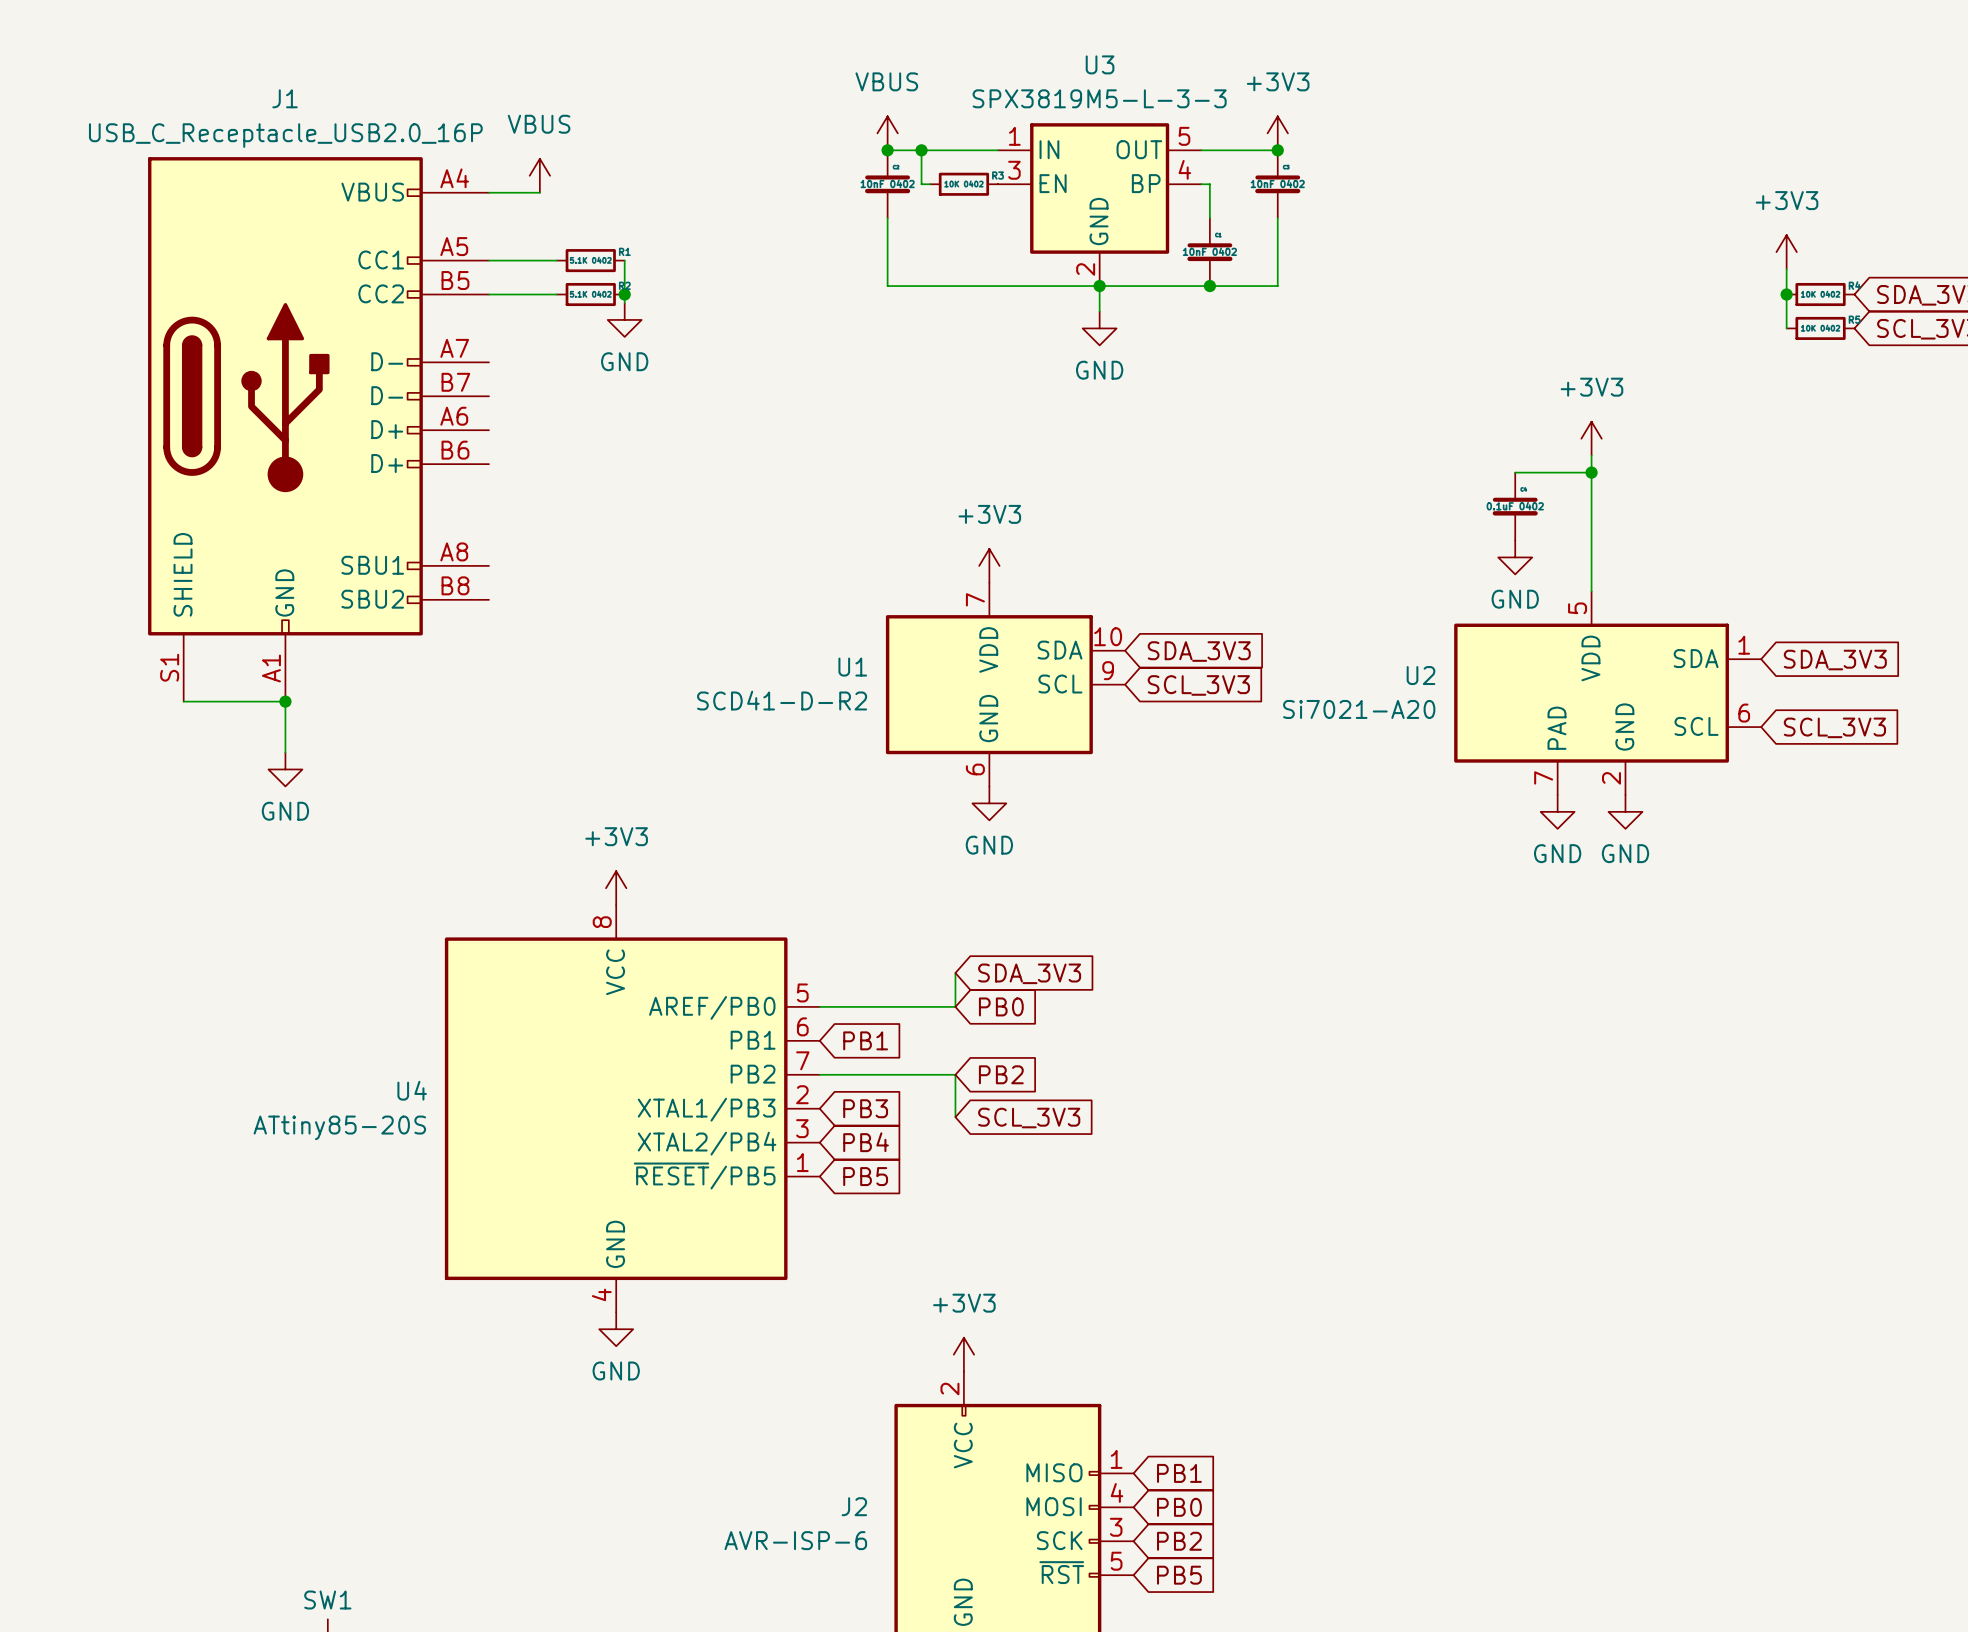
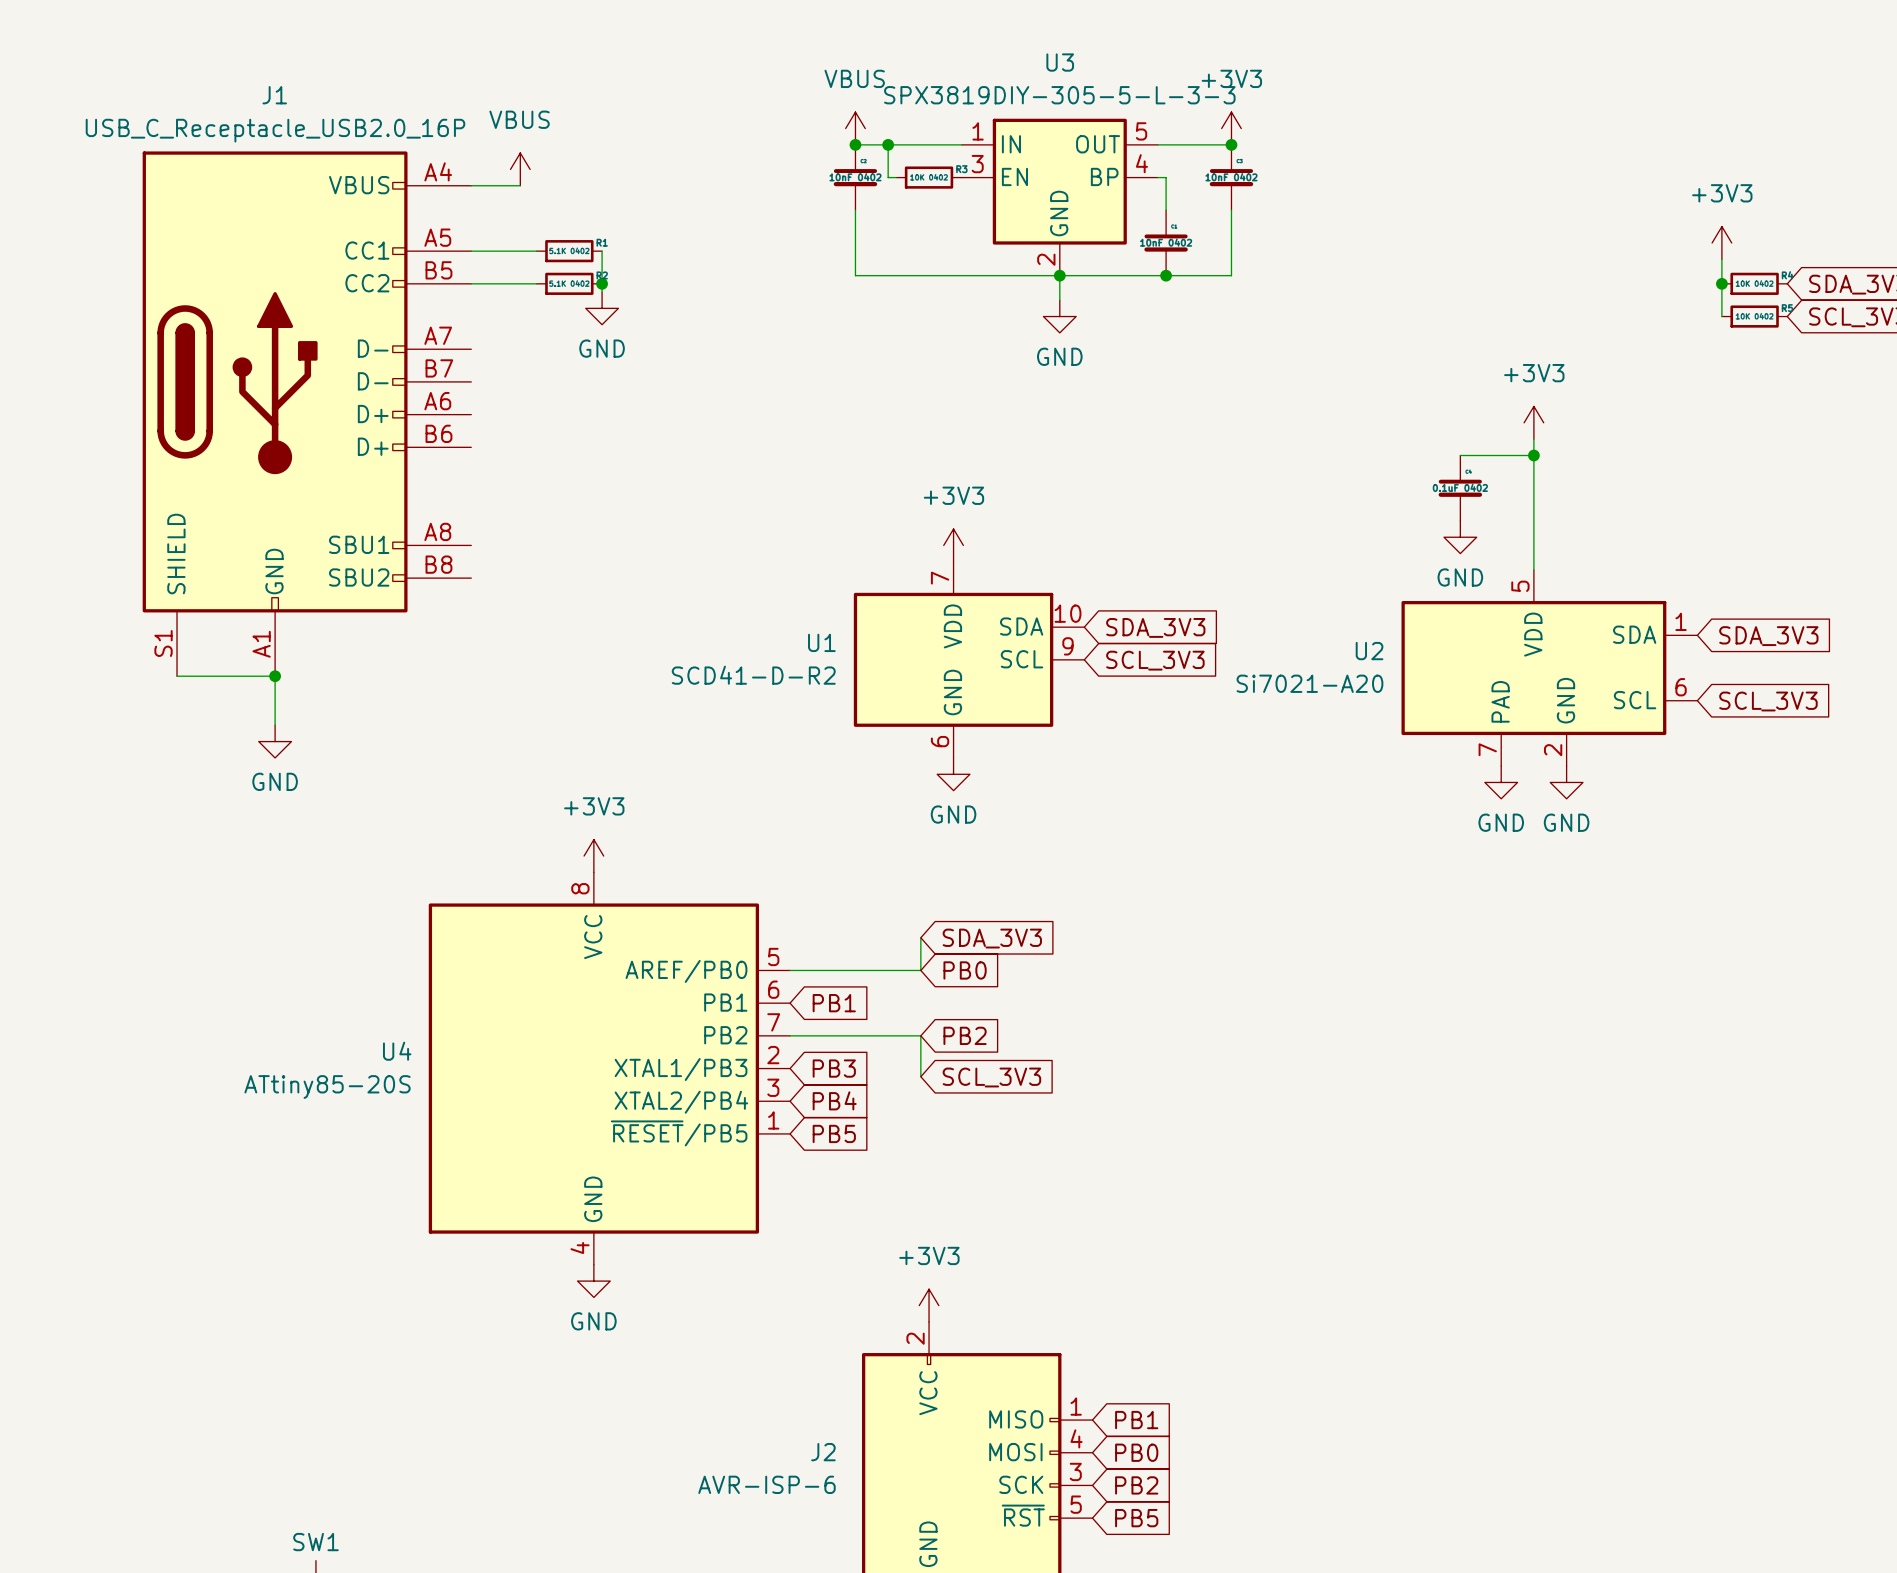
U3 value: SPX3819M5-L-3-3 (1099, 98) -> SPX3819DIY-305-5-L-3-3 (1059, 95)

